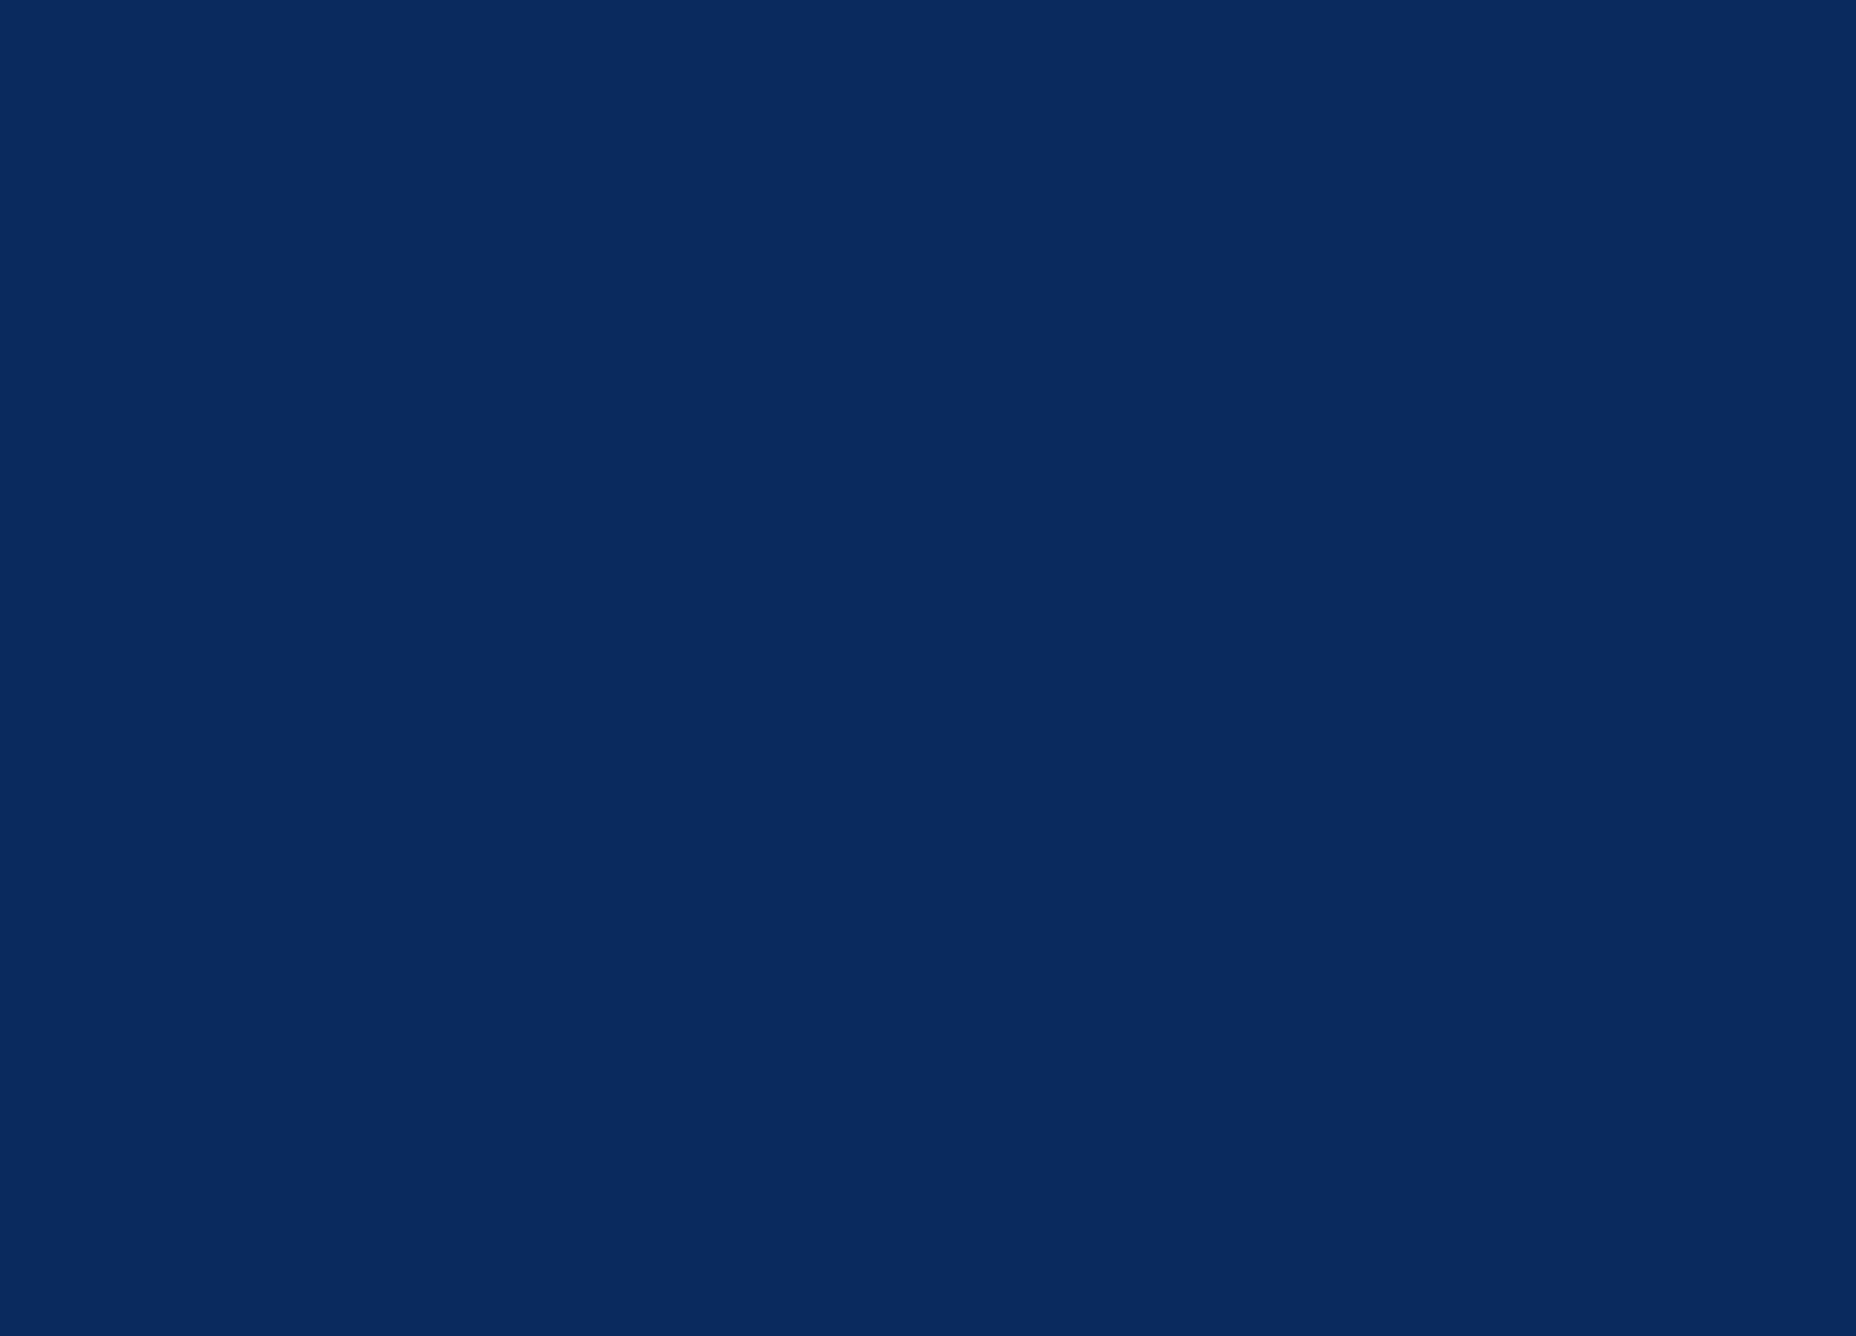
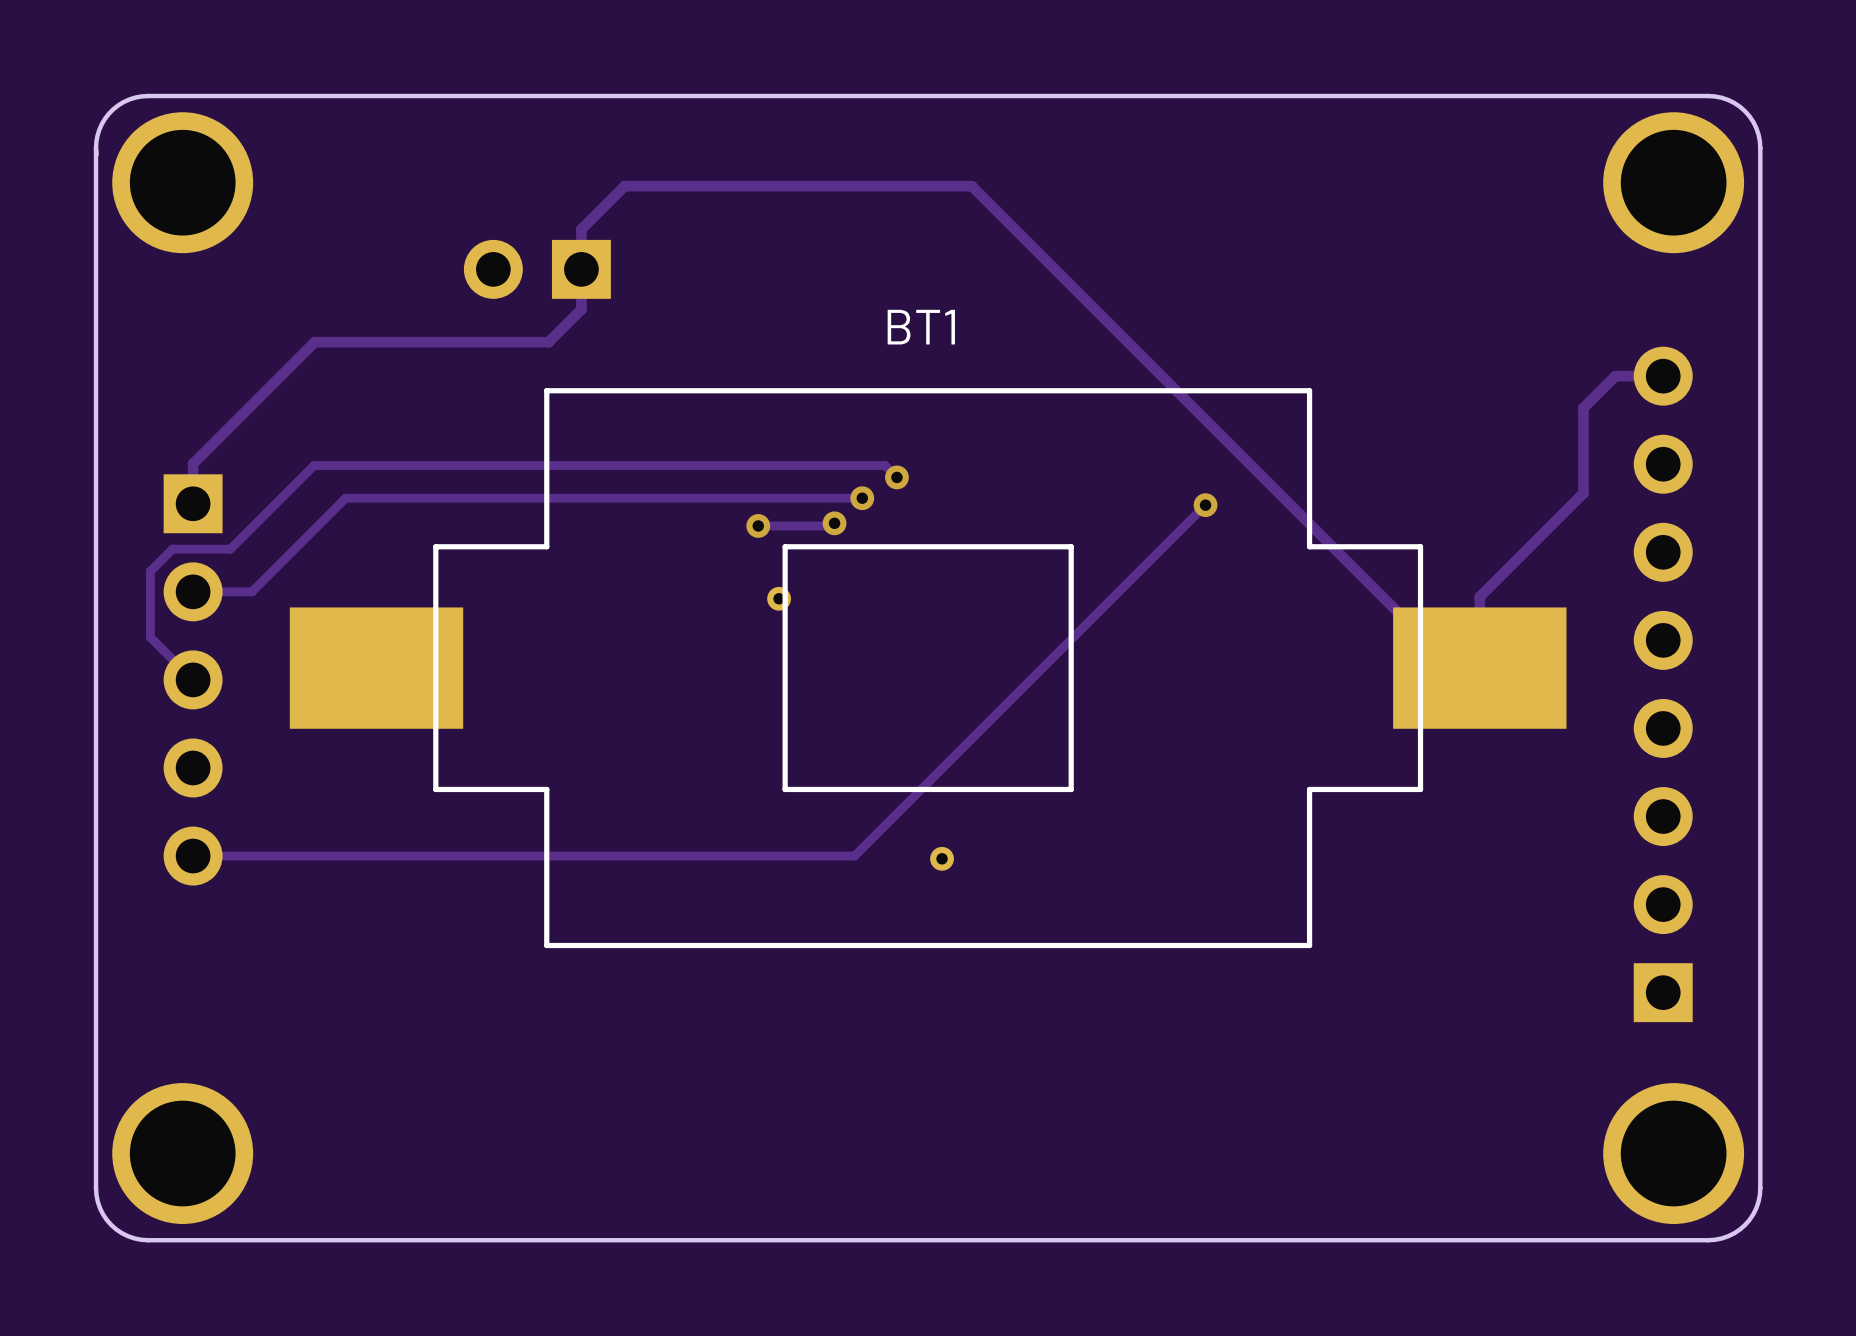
board edge: none -> (96, 148) (96, 1188) (97, 1201) (102, 1214) (111, 1224) (122, 1233) (134, 1238) (148, 1240) (1708, 1240) (1721, 1238) (1734, 1233) (1745, 1224) (1753, 1214) (1758, 1201) (1760, 1188) (1760, 148) (1758, 134) (1753, 122) (1745, 111) (1734, 102) (1721, 97) (1708, 96) (148, 96) (129, 99) (118, 105) (108, 113) (101, 124) (97, 135) (96, 154)
part: none -> (182, 182)
part: none -> (1673, 182)
part: none -> (537, 269)
track: none -> (1663, 376) (1615, 376) (1583, 408) (1583, 493) (1479, 596) (1479, 668) (1453, 668) (971, 186) (624, 186) (581, 229) (581, 309) (548, 342) (314, 342) (193, 463) (193, 503)
track: none -> (896, 477) (885, 465) (314, 465) (230, 549) (172, 549) (150, 571) (150, 637) (193, 679)
via: none -> (896, 477)
track: none -> (862, 498) (345, 498) (252, 591) (193, 591)
via: none -> (862, 498)
track: none -> (1205, 505) (854, 856) (193, 856)
via: none -> (1205, 505)
track: none -> (834, 523) (831, 525) (758, 525)
via: none -> (834, 523)
via: none -> (758, 525)
part: none -> (779, 598)
BT1: none -> (928, 668)
part: none -> (193, 679)
part: none -> (1663, 684)
part: none -> (942, 858)
part: none -> (182, 1153)
part: none -> (1673, 1153)

